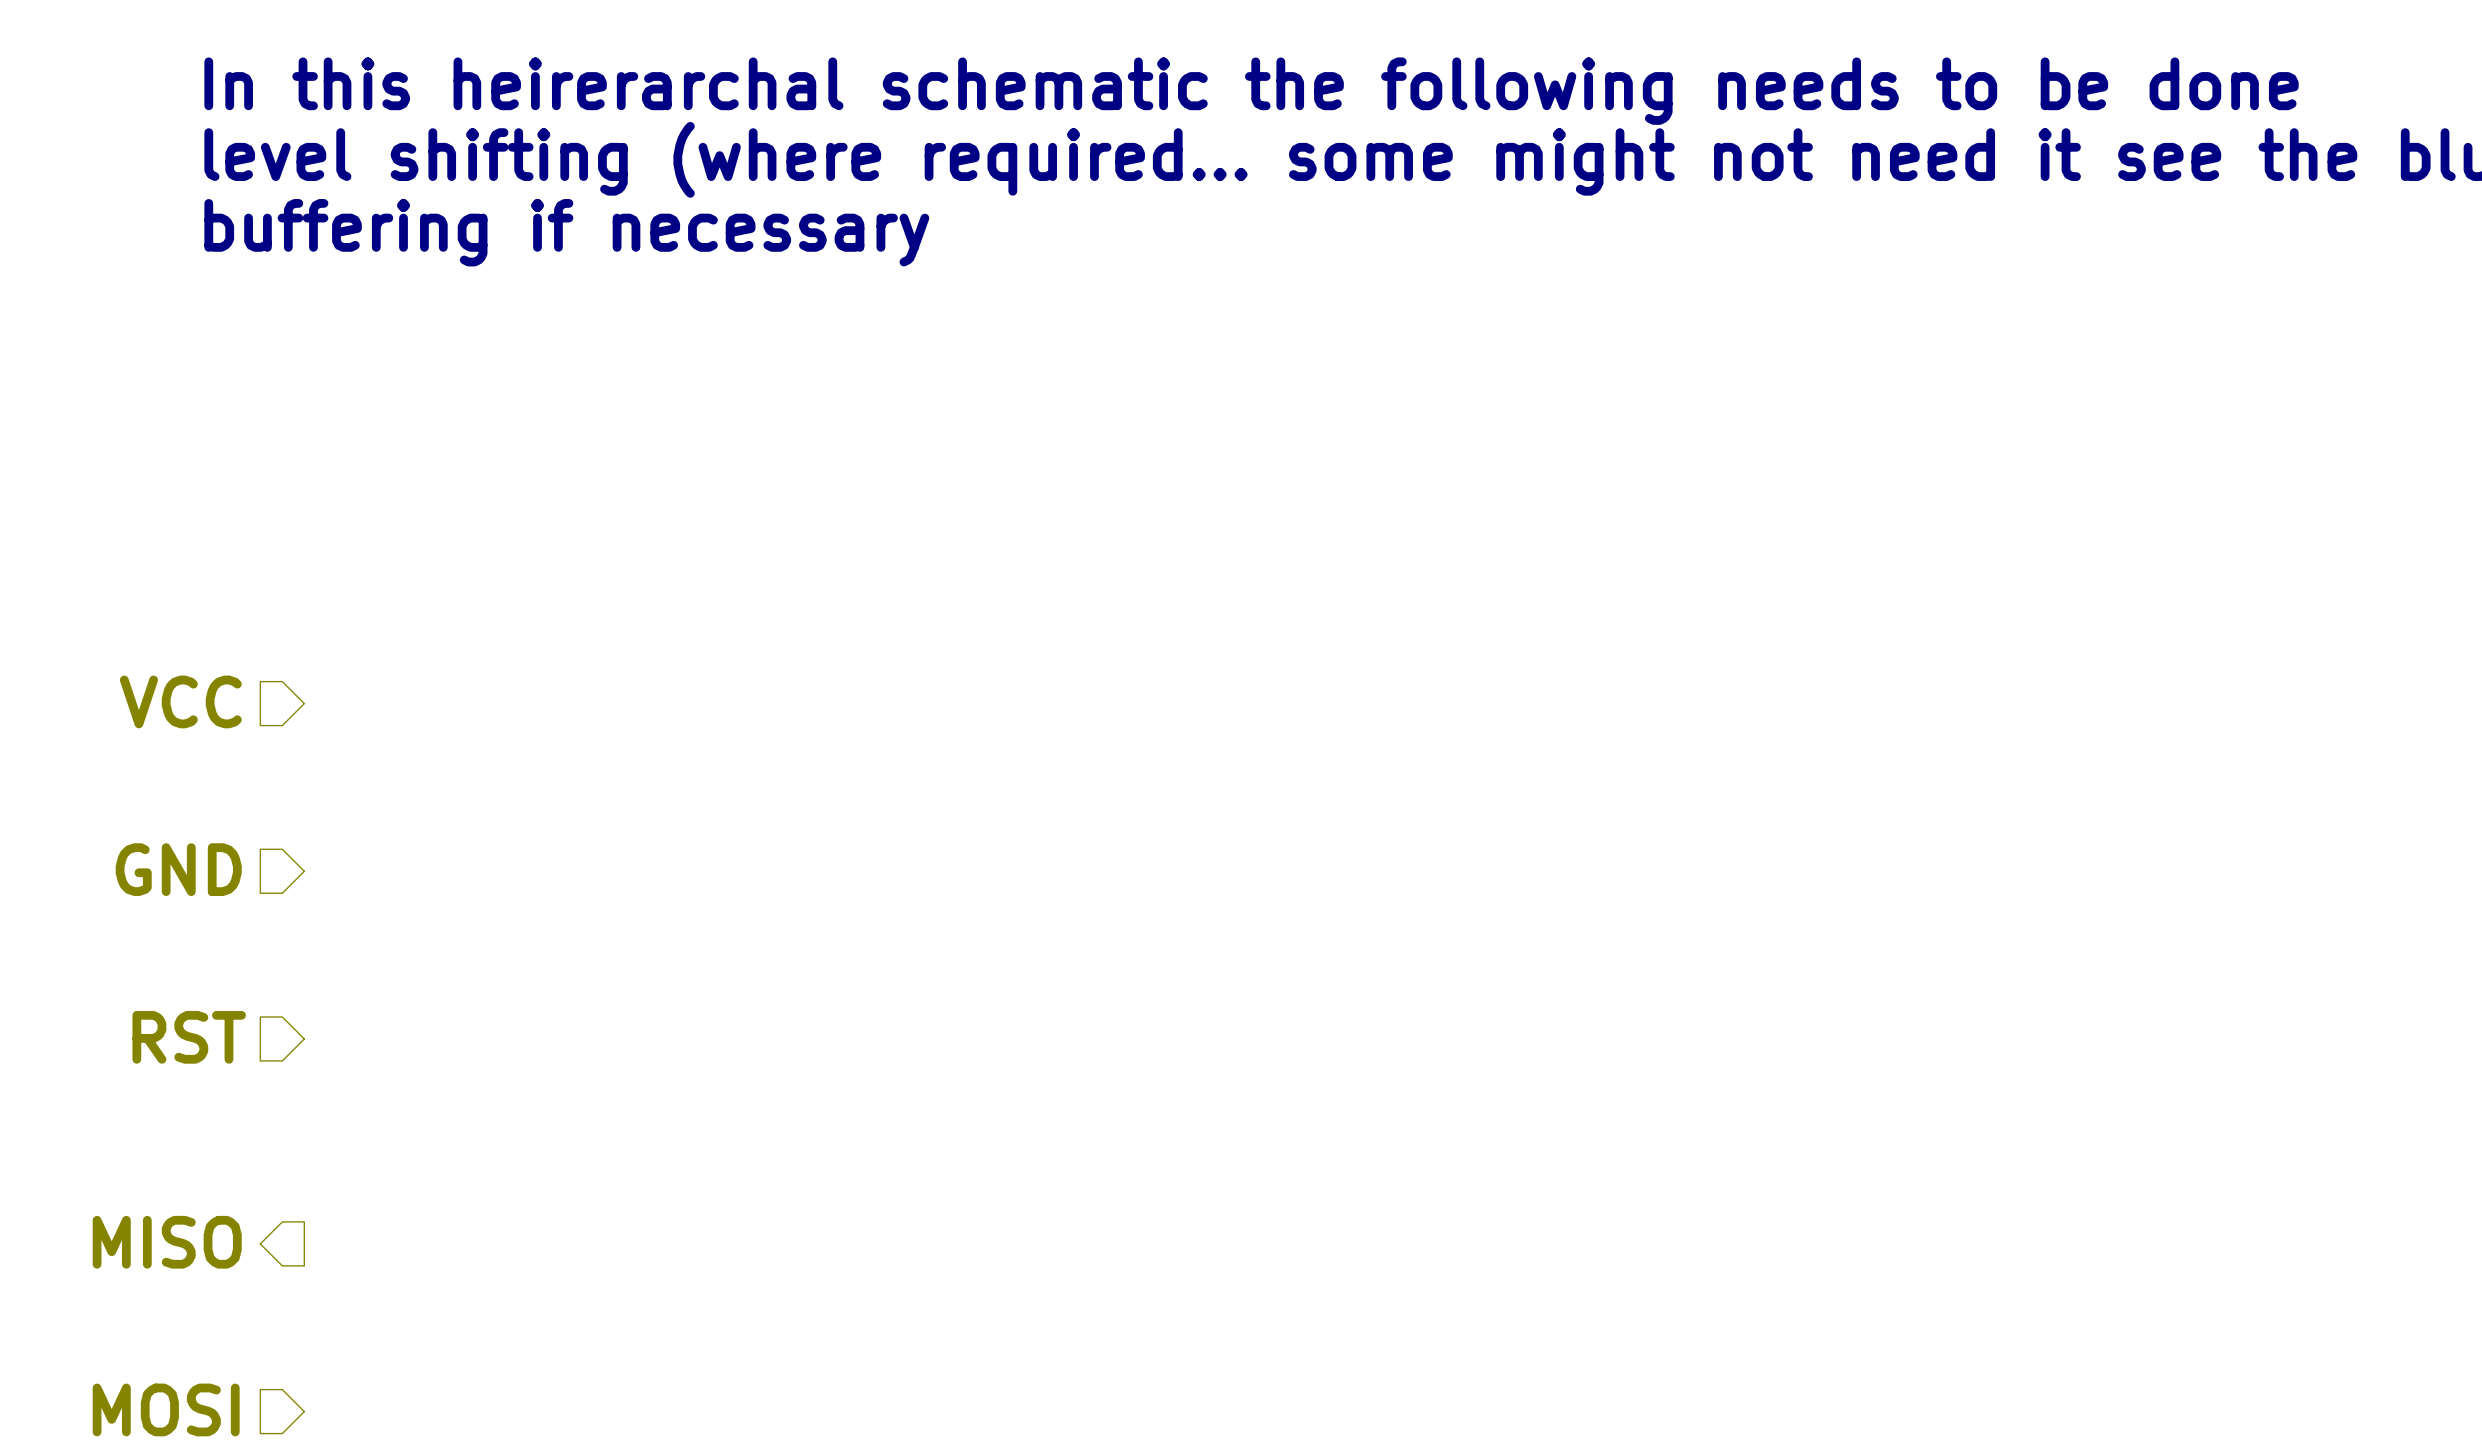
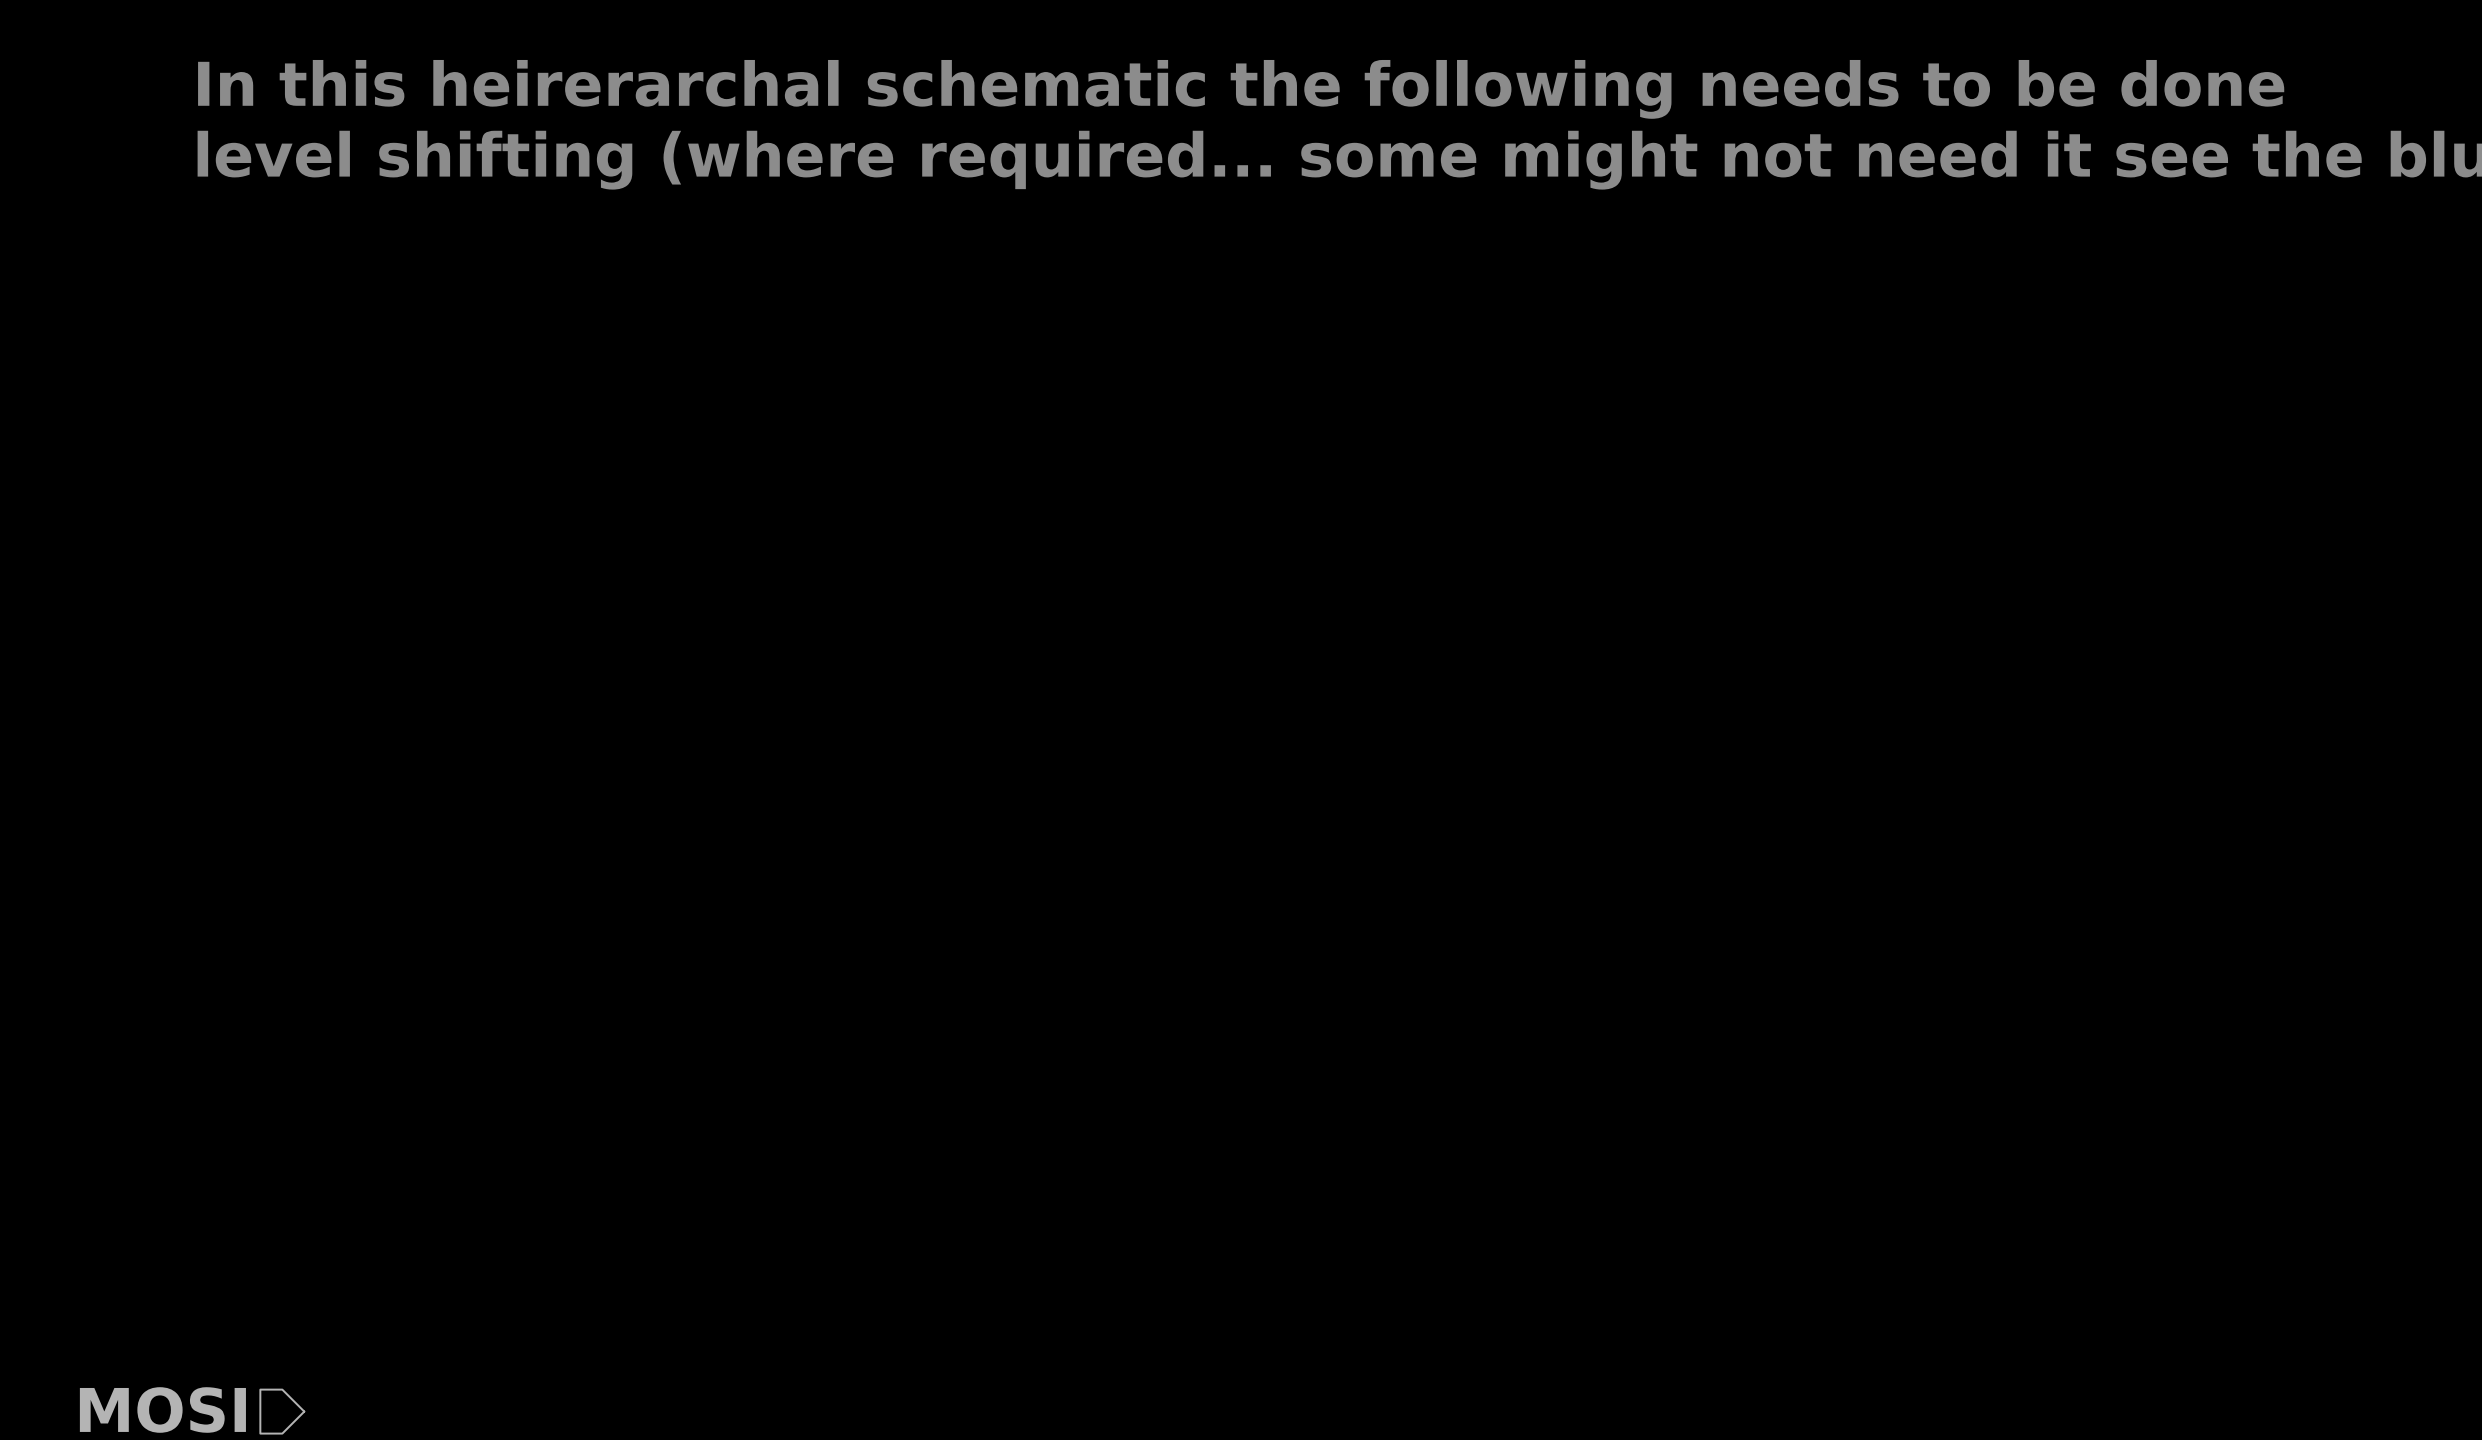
text: buffering if necessary (566, 232) -> none
hierarchical label: VCC (180, 701) -> none
hierarchical label: GND (178, 869) -> none
hierarchical label: RST (189, 1037) -> none
hierarchical label: MISO (167, 1242) -> none

